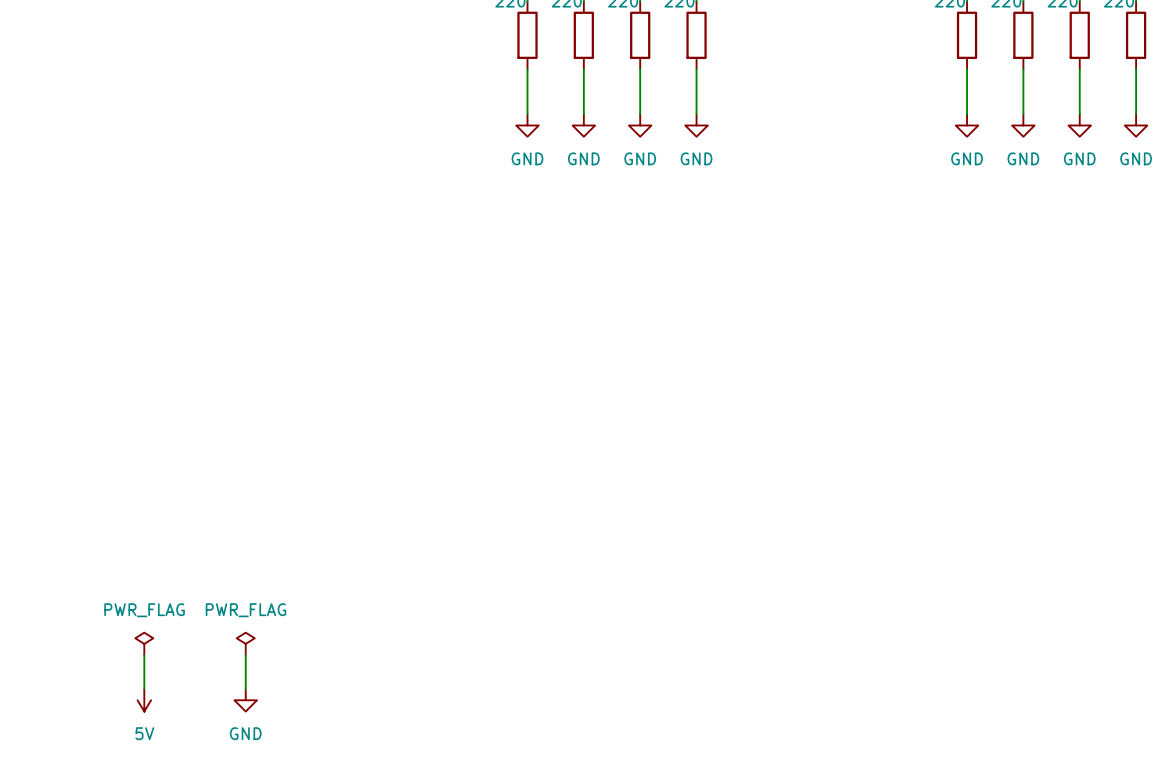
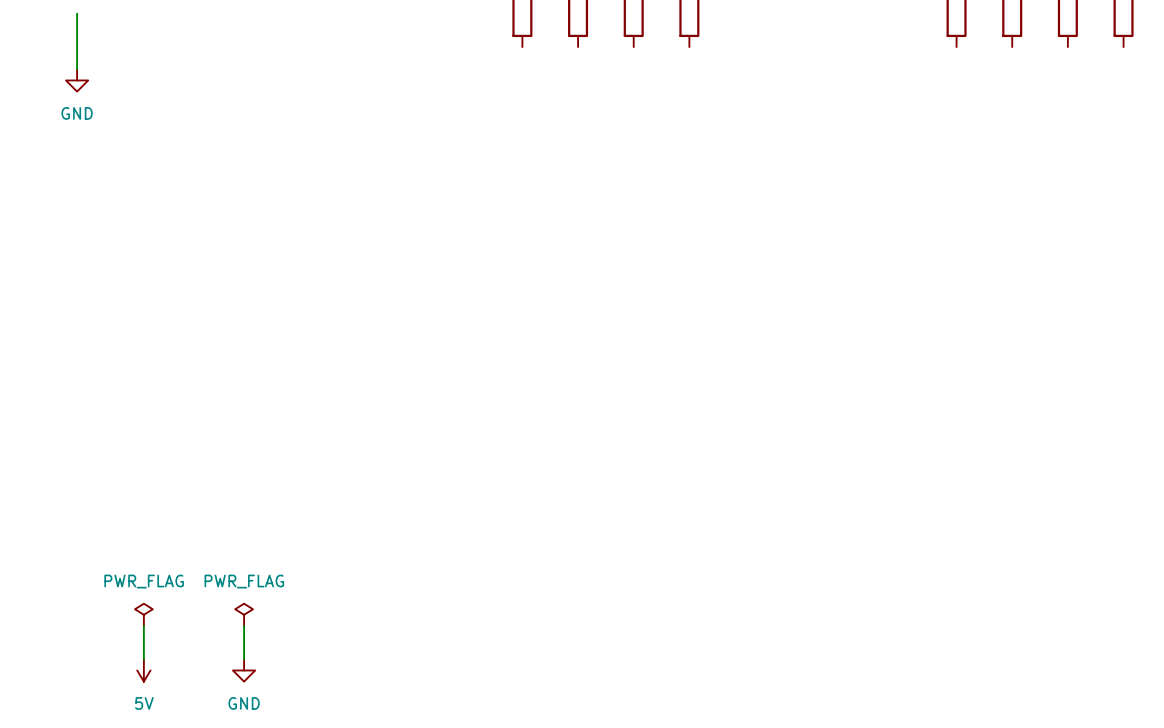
wire: none -> (77, 13) (77, 69)
wire: (527, 69) (527, 114) -> none
wire: (583, 69) (583, 114) -> none
wire: (640, 69) (640, 114) -> none
wire: (696, 69) (696, 114) -> none
wire: (967, 69) (967, 114) -> none
wire: (1023, 69) (1023, 114) -> none
wire: (1079, 69) (1079, 114) -> none
wire: (1136, 69) (1136, 114) -> none
power symbol: none -> GND (77, 80)
power symbol: GND (527, 125) -> none
power symbol: GND (583, 125) -> none
power symbol: GND (640, 125) -> none
power symbol: GND (696, 125) -> none
power symbol: GND (967, 125) -> none
power symbol: GND (1023, 125) -> none
power symbol: GND (1079, 125) -> none
power symbol: GND (1136, 125) -> none

